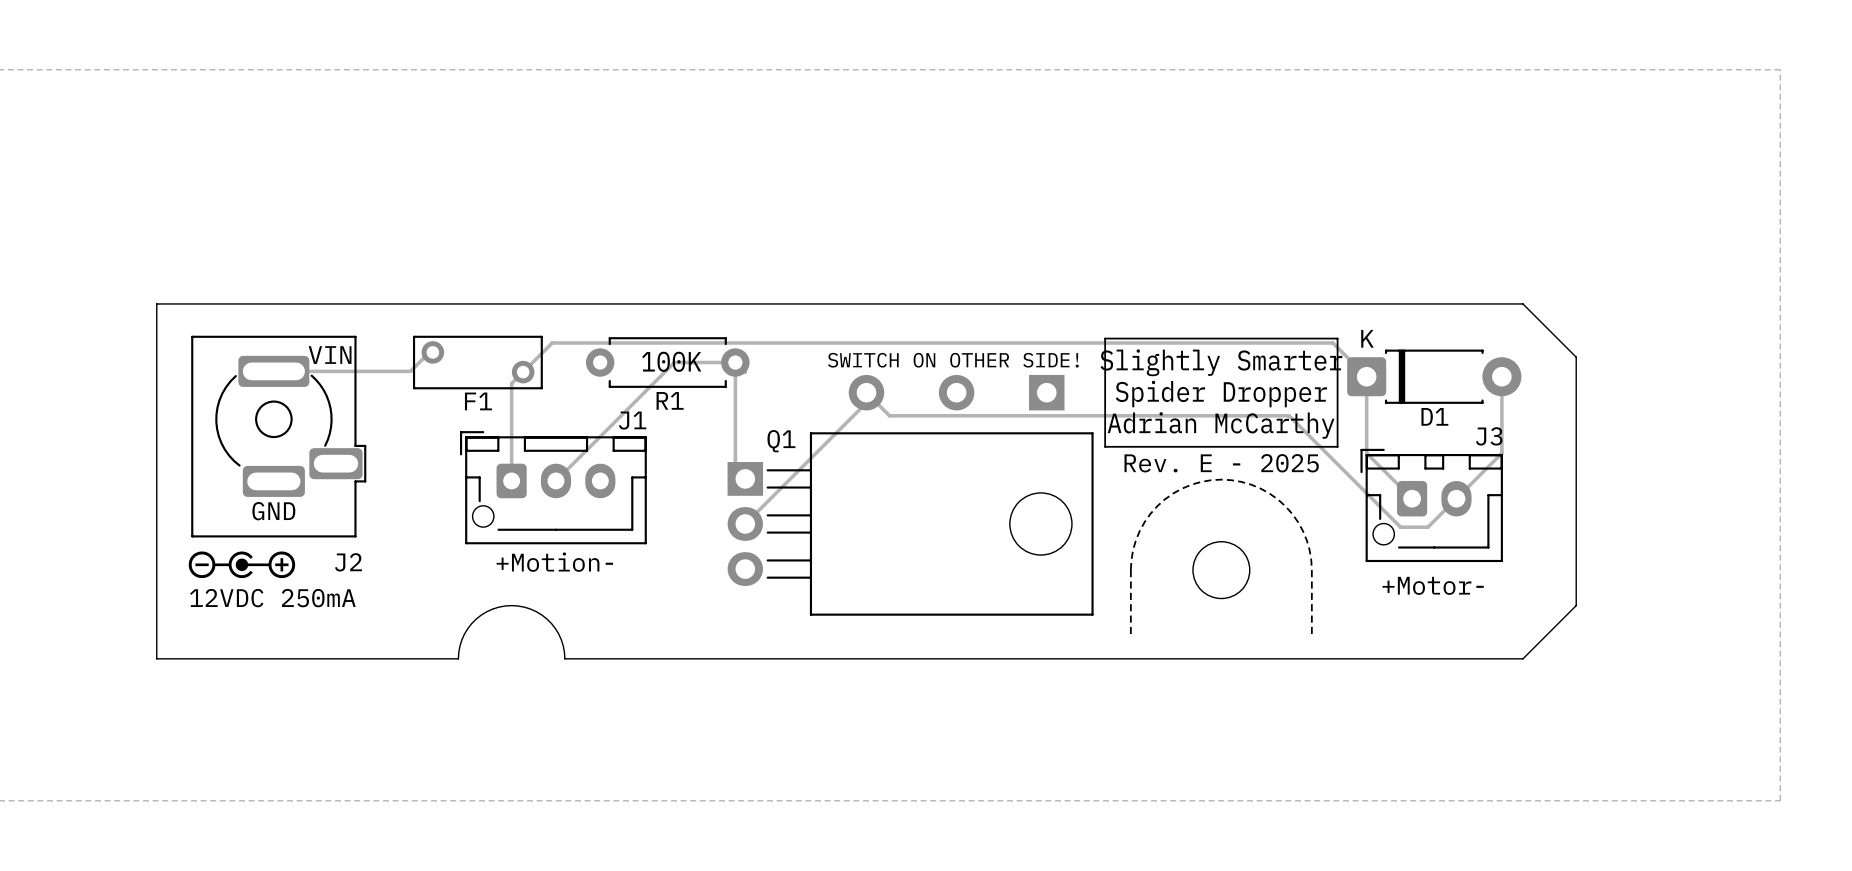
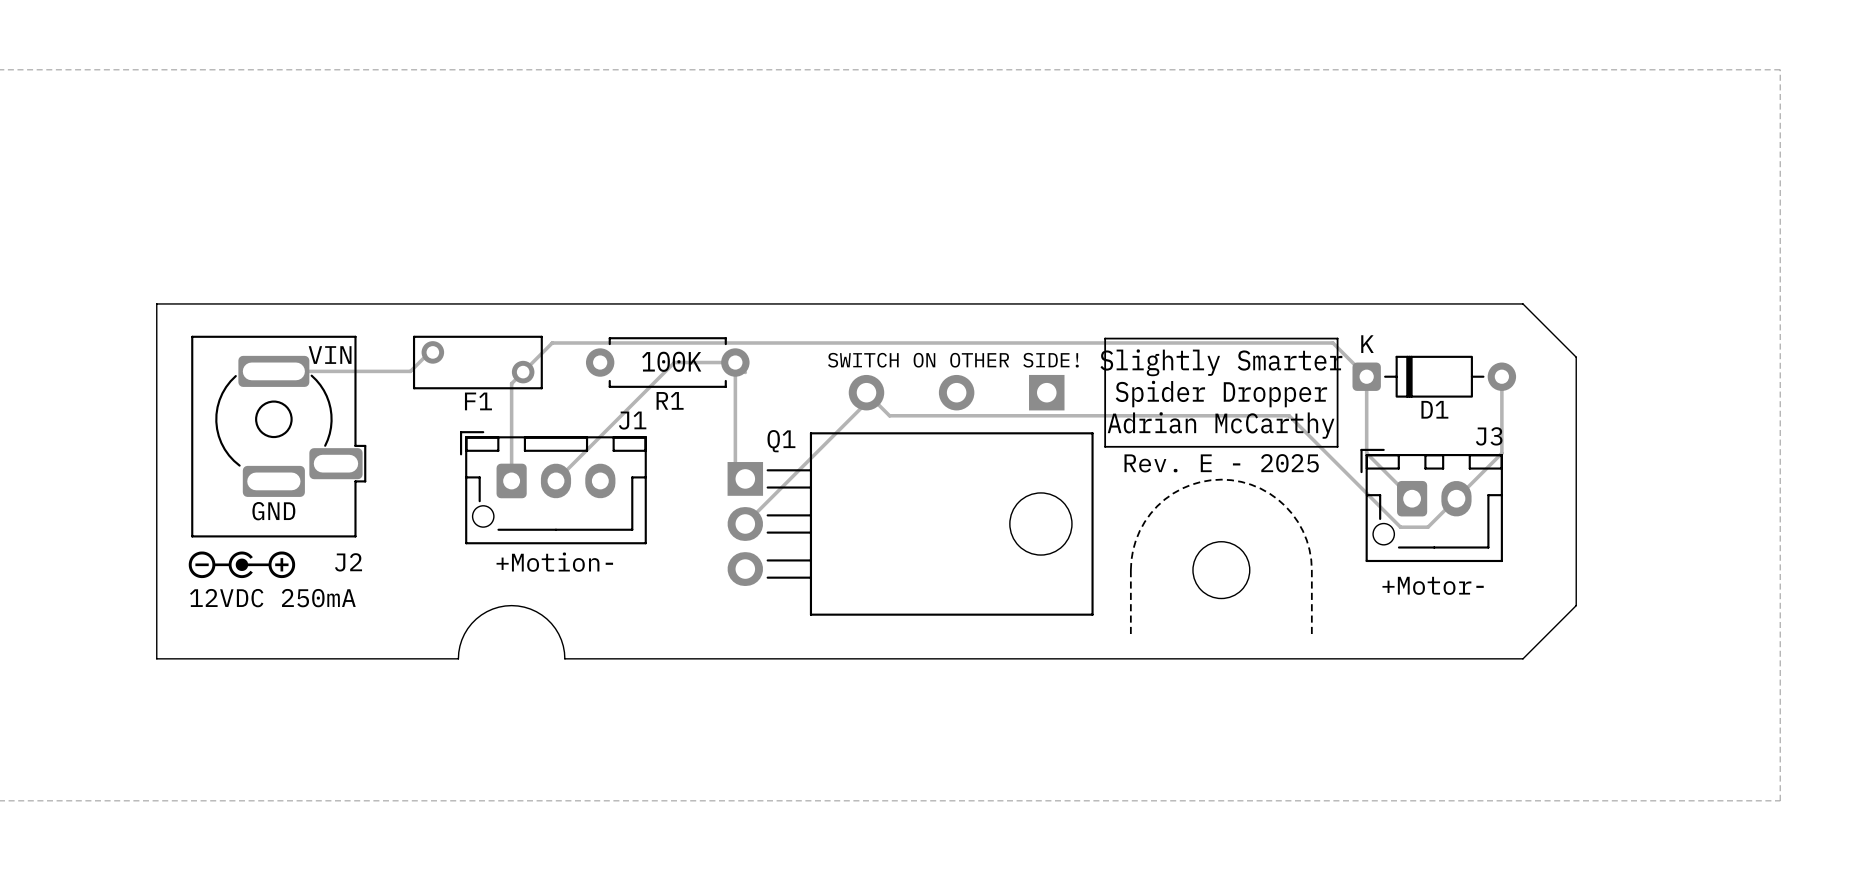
D1 footprint: [1347, 349, 1522, 404] -> [1352, 355, 1517, 398]

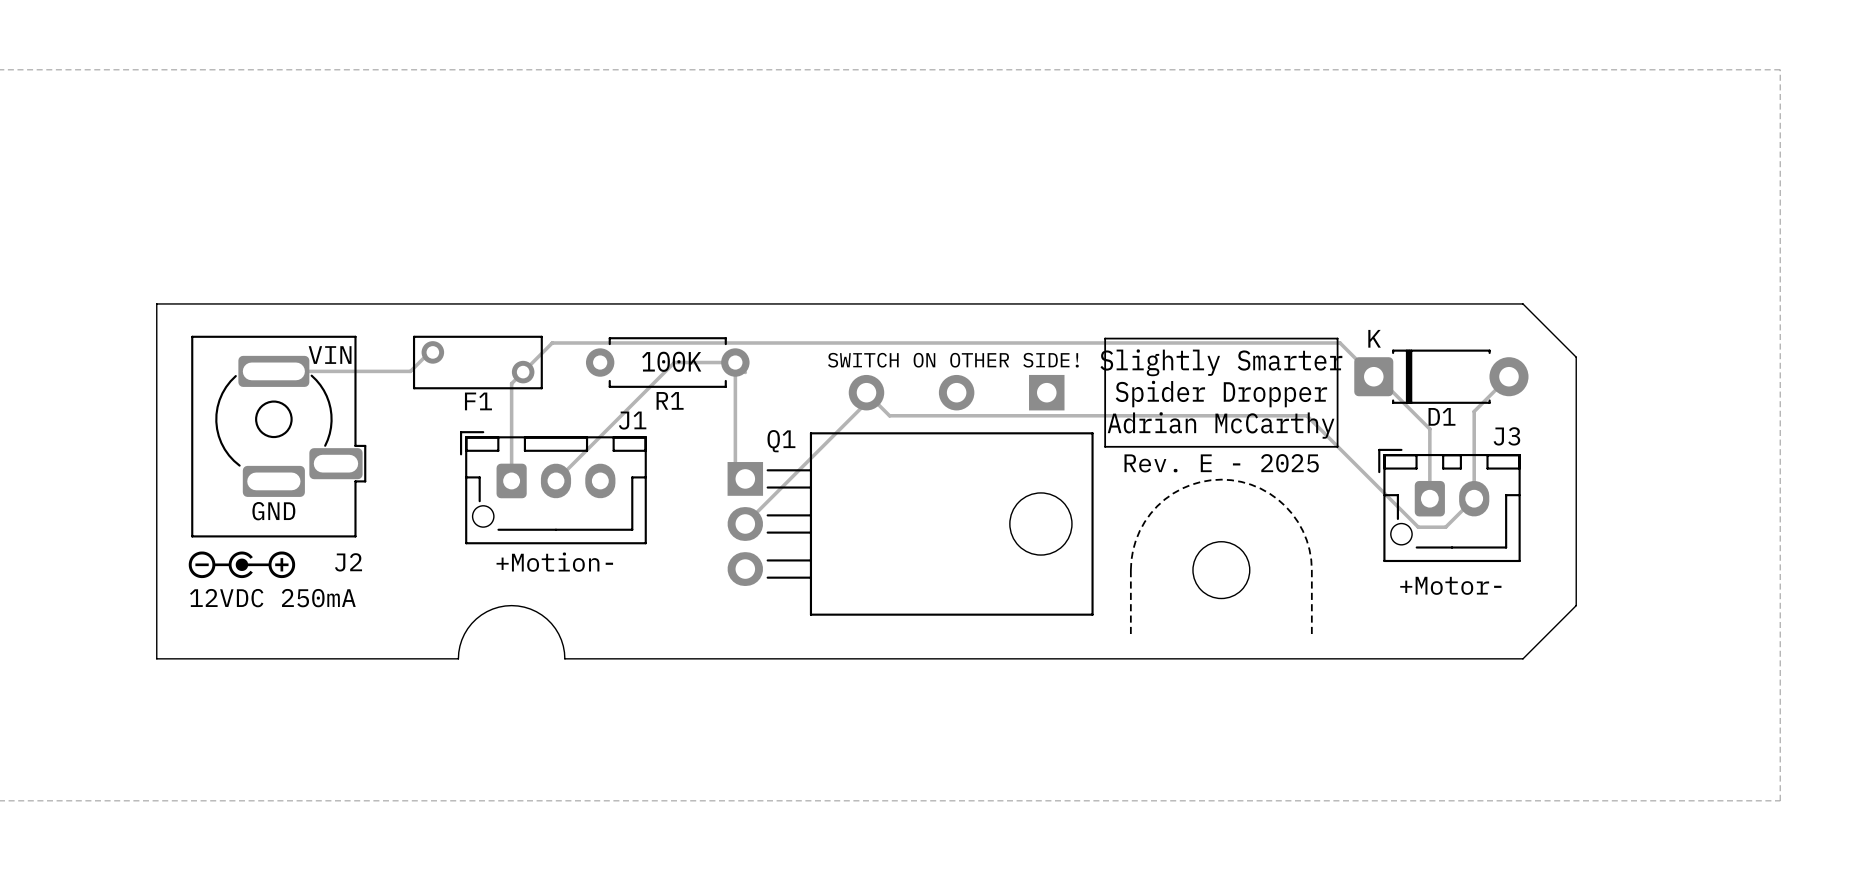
track: (1332, 342) (1366, 376) (1366, 453) (1412, 498) -> (1332, 342) (1340, 342) (1373, 376) (1377, 376) (1429, 429) (1429, 498)
D1 footprint: [1352, 355, 1517, 398] -> [1354, 349, 1529, 404]
track: (1501, 376) (1501, 453) (1427, 527) -> (1508, 376) (1474, 411) (1474, 498) (1445, 527) (1427, 527)
track: (1289, 415) (1400, 527) (1418, 527) -> (1289, 415) (1306, 415) (1418, 527)
J3 position: (1431, 505) -> (1449, 505)
text position: +Motor- (1433, 585) -> +Motor- (1450, 585)

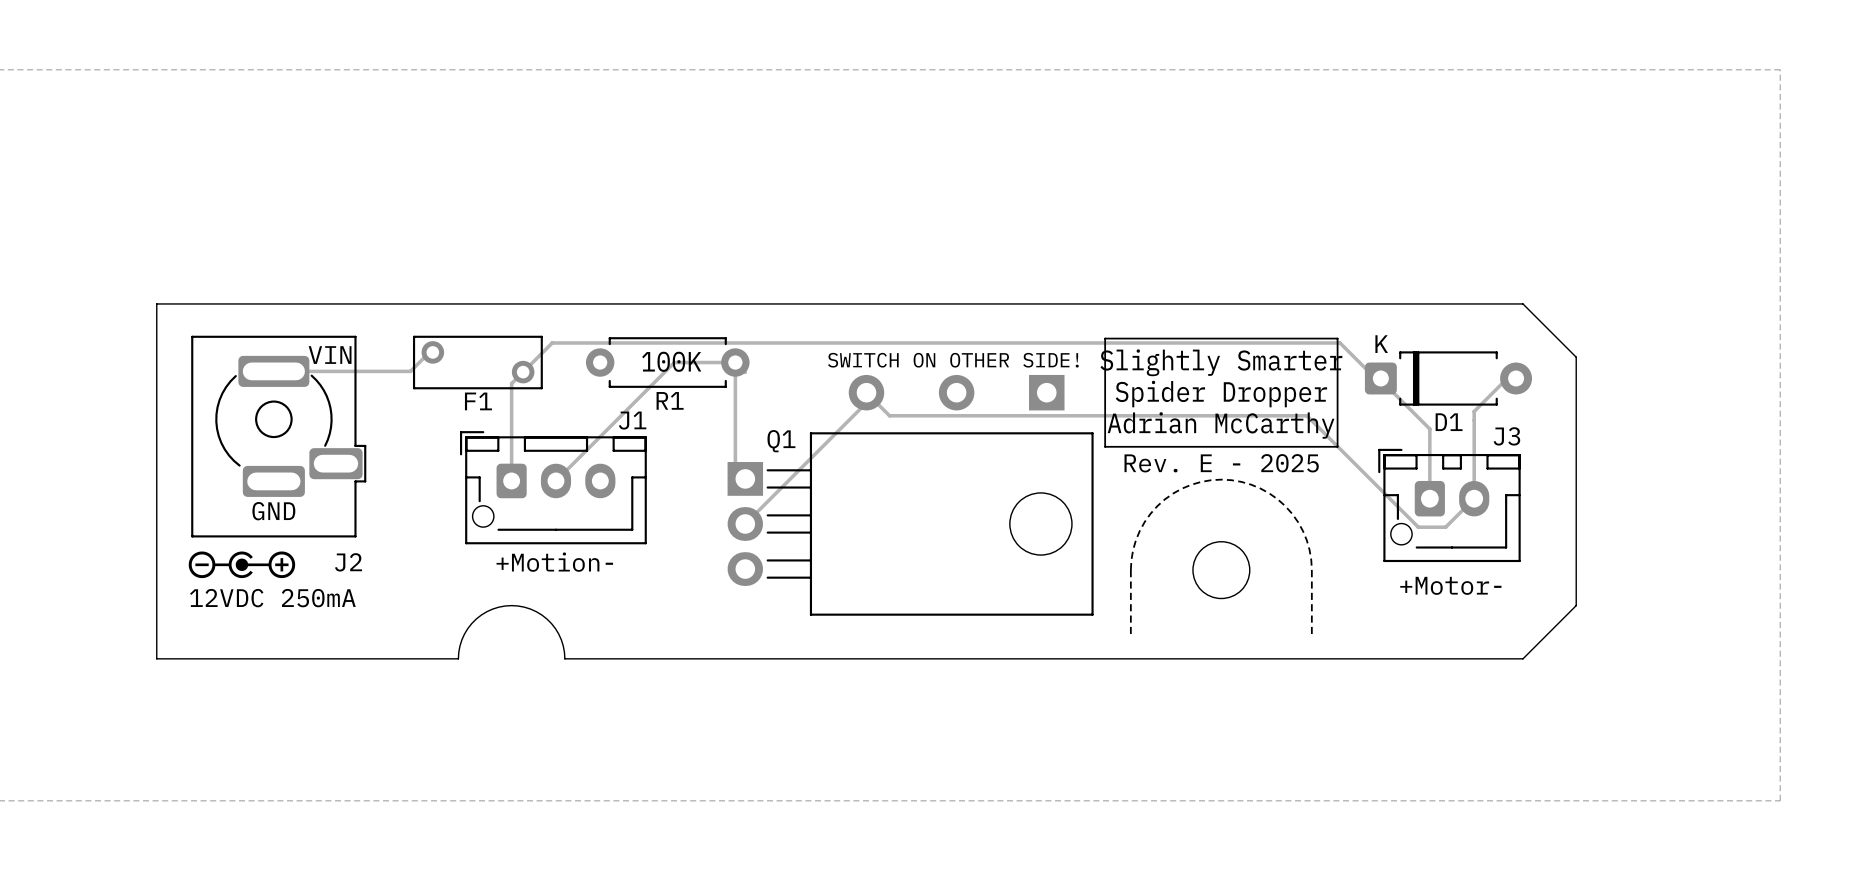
D1 footprint: [1354, 349, 1529, 404] -> [1364, 351, 1533, 406]

